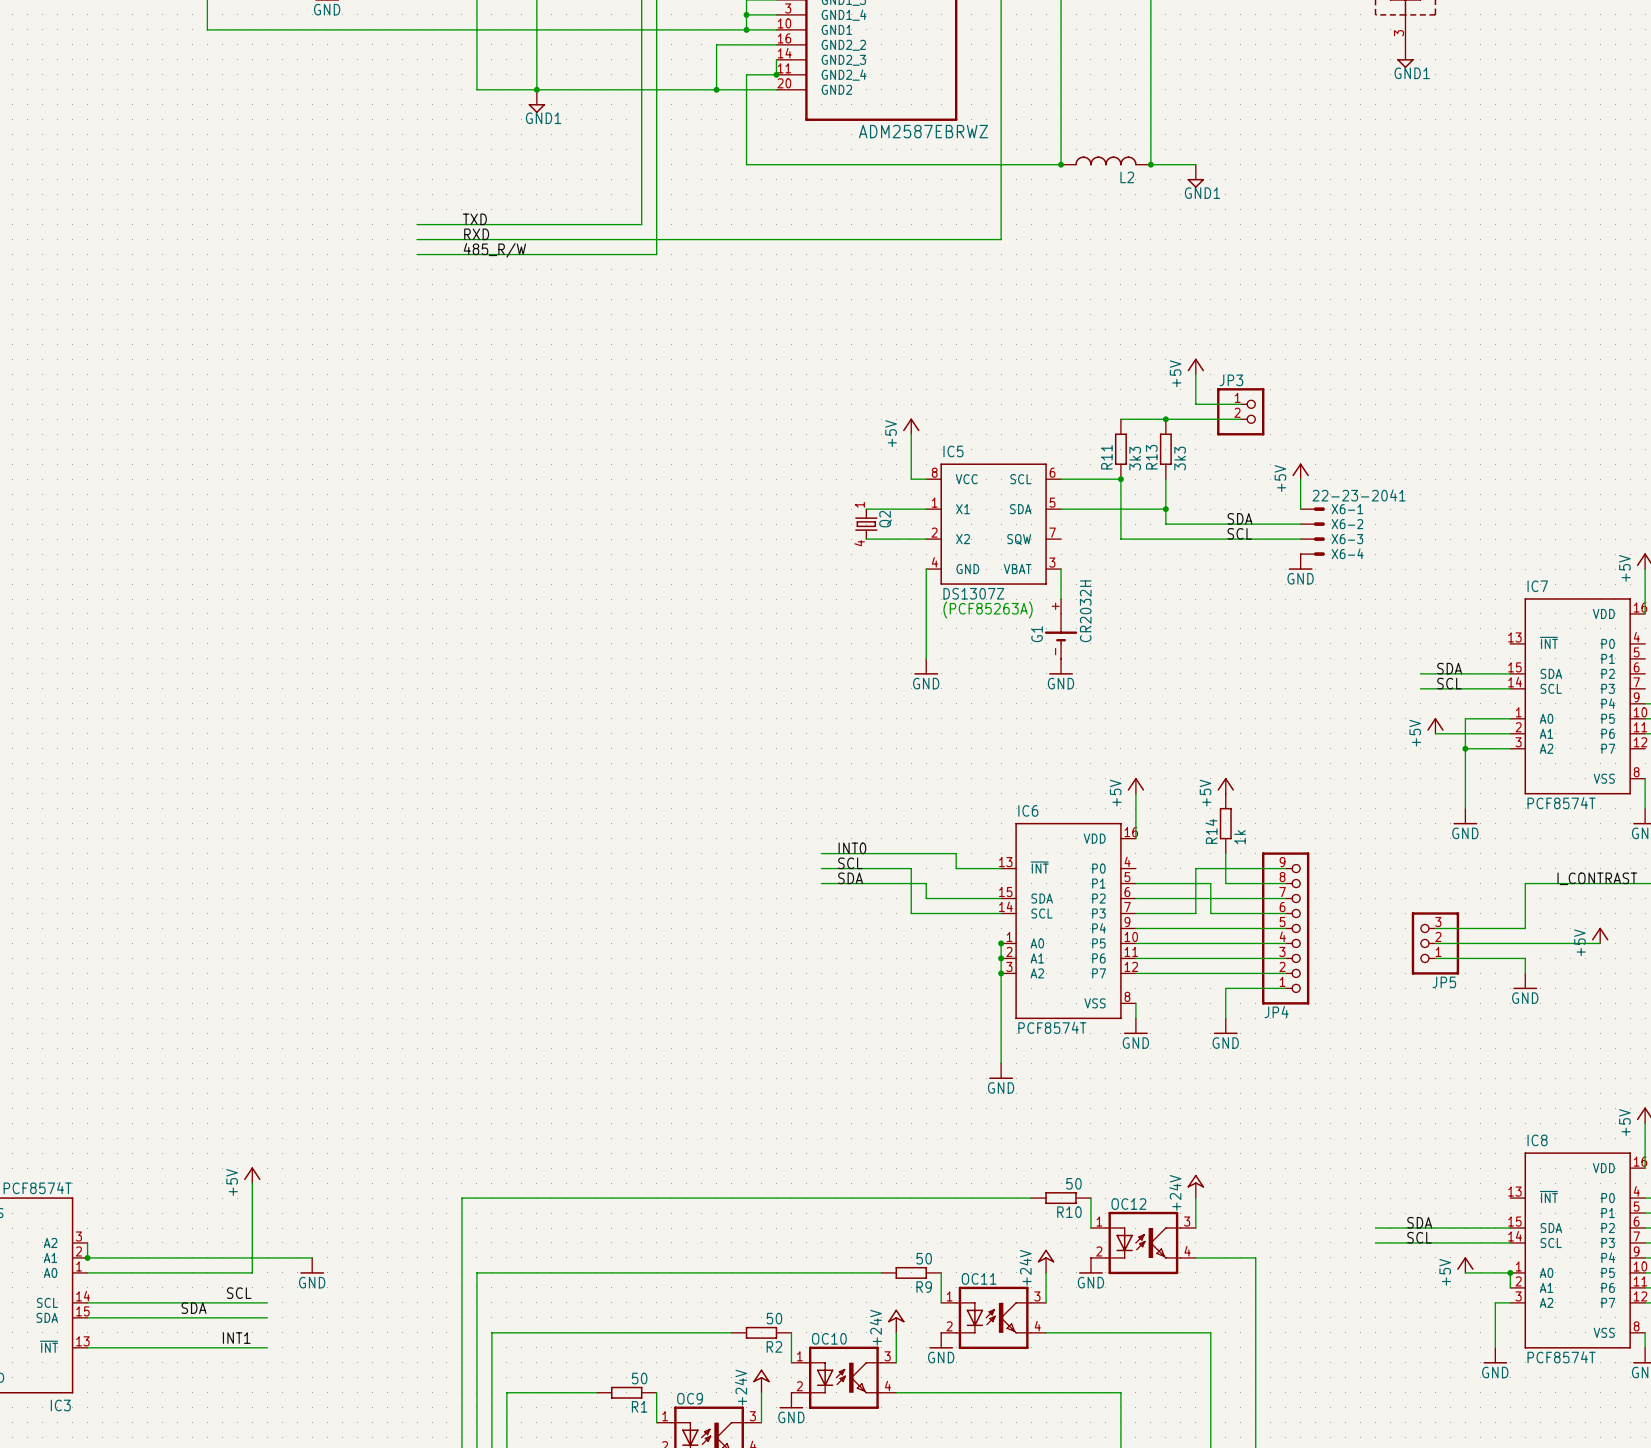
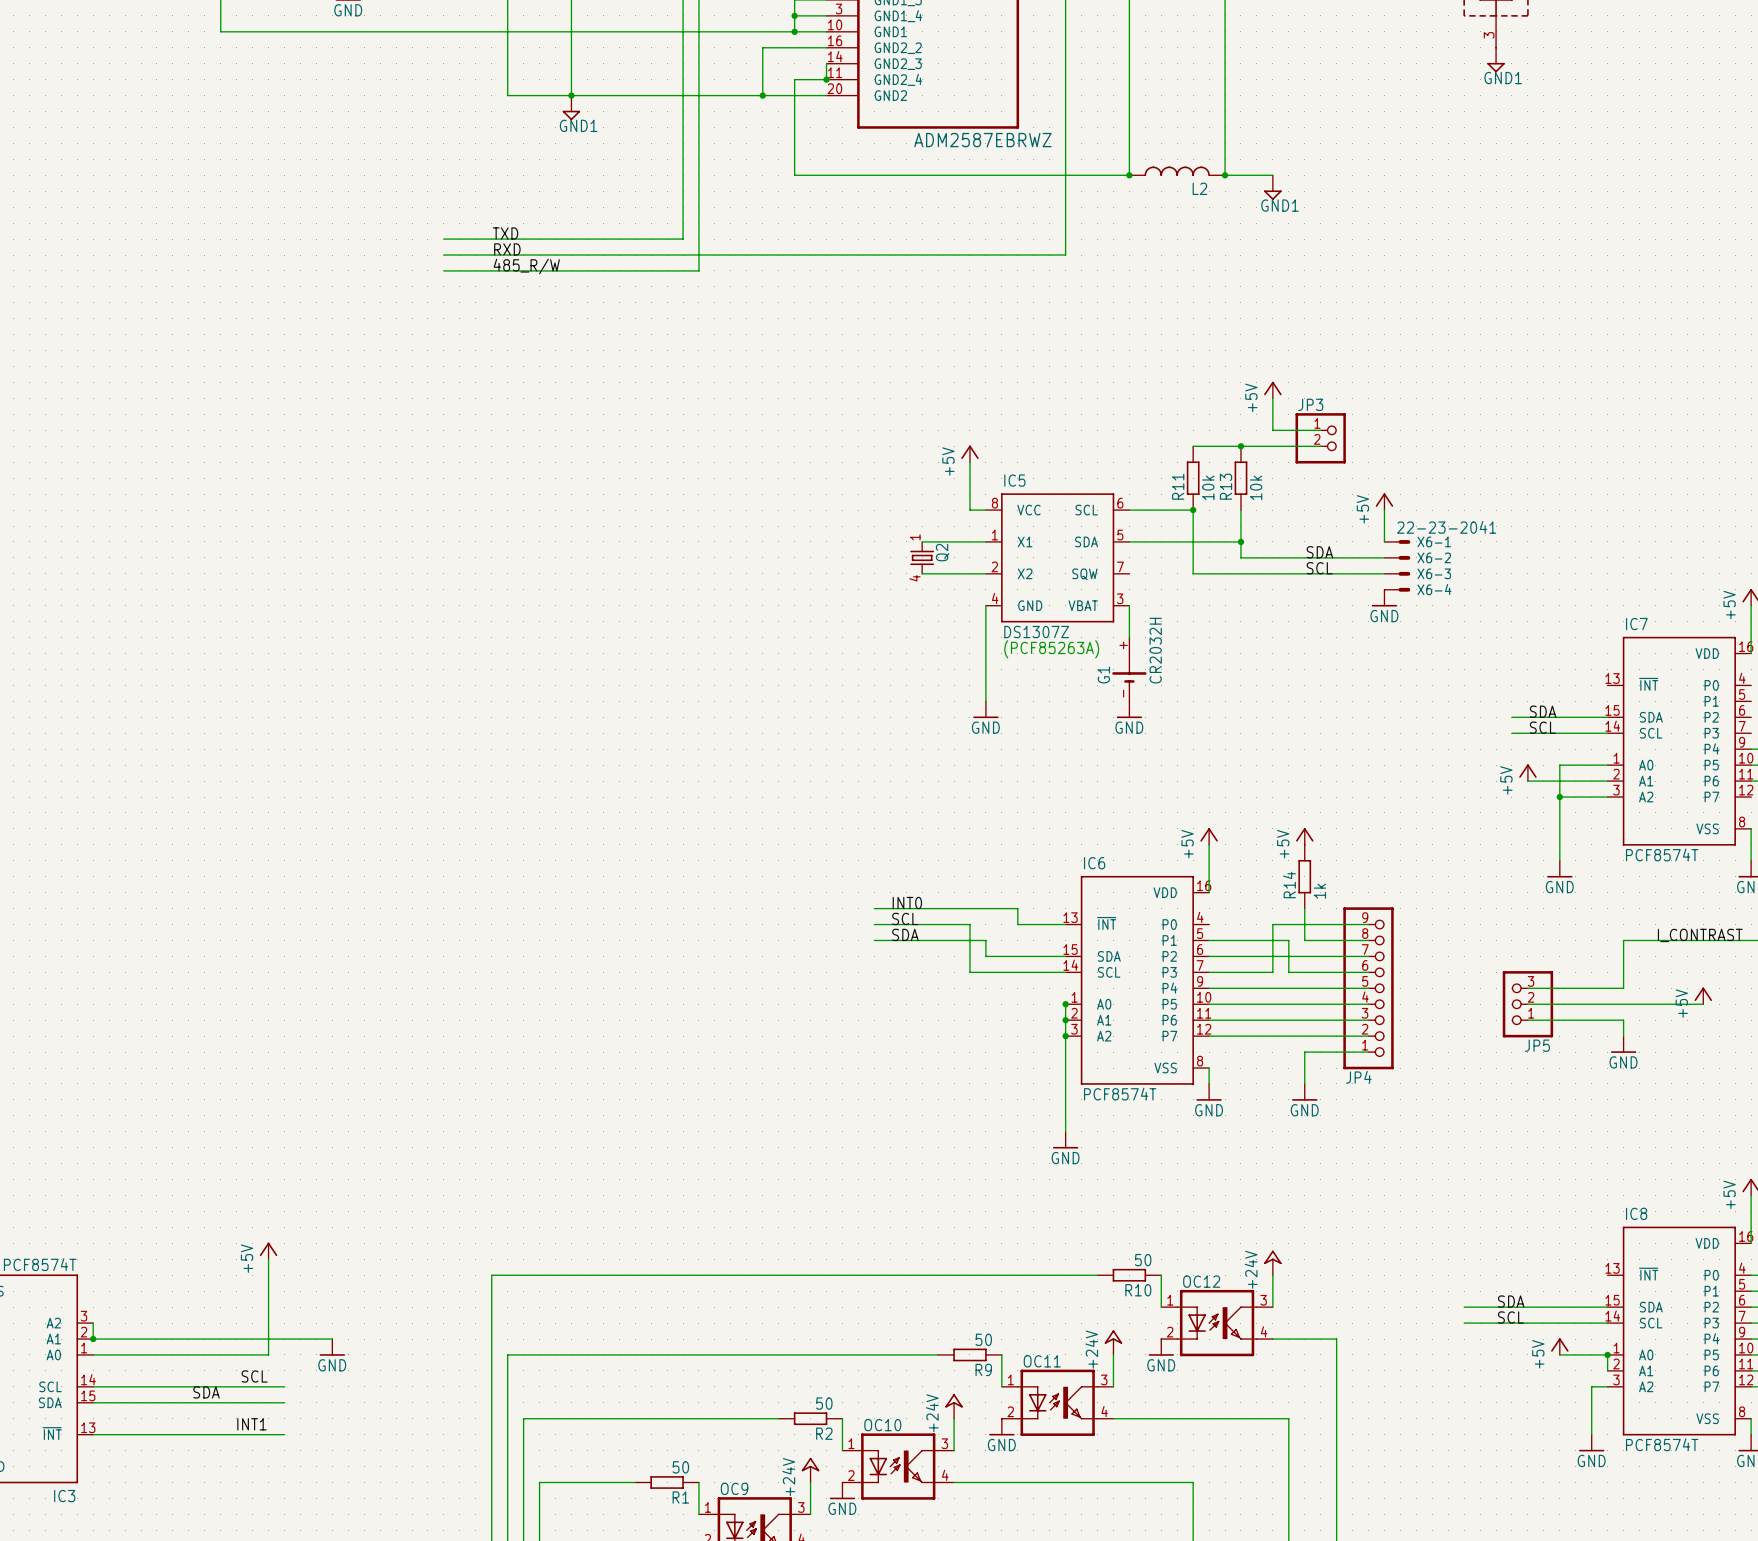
R11 value: 3k3 (1135, 458) -> 10k (1208, 487)
R13 value: 3k3 (1180, 458) -> 10k (1256, 487)

